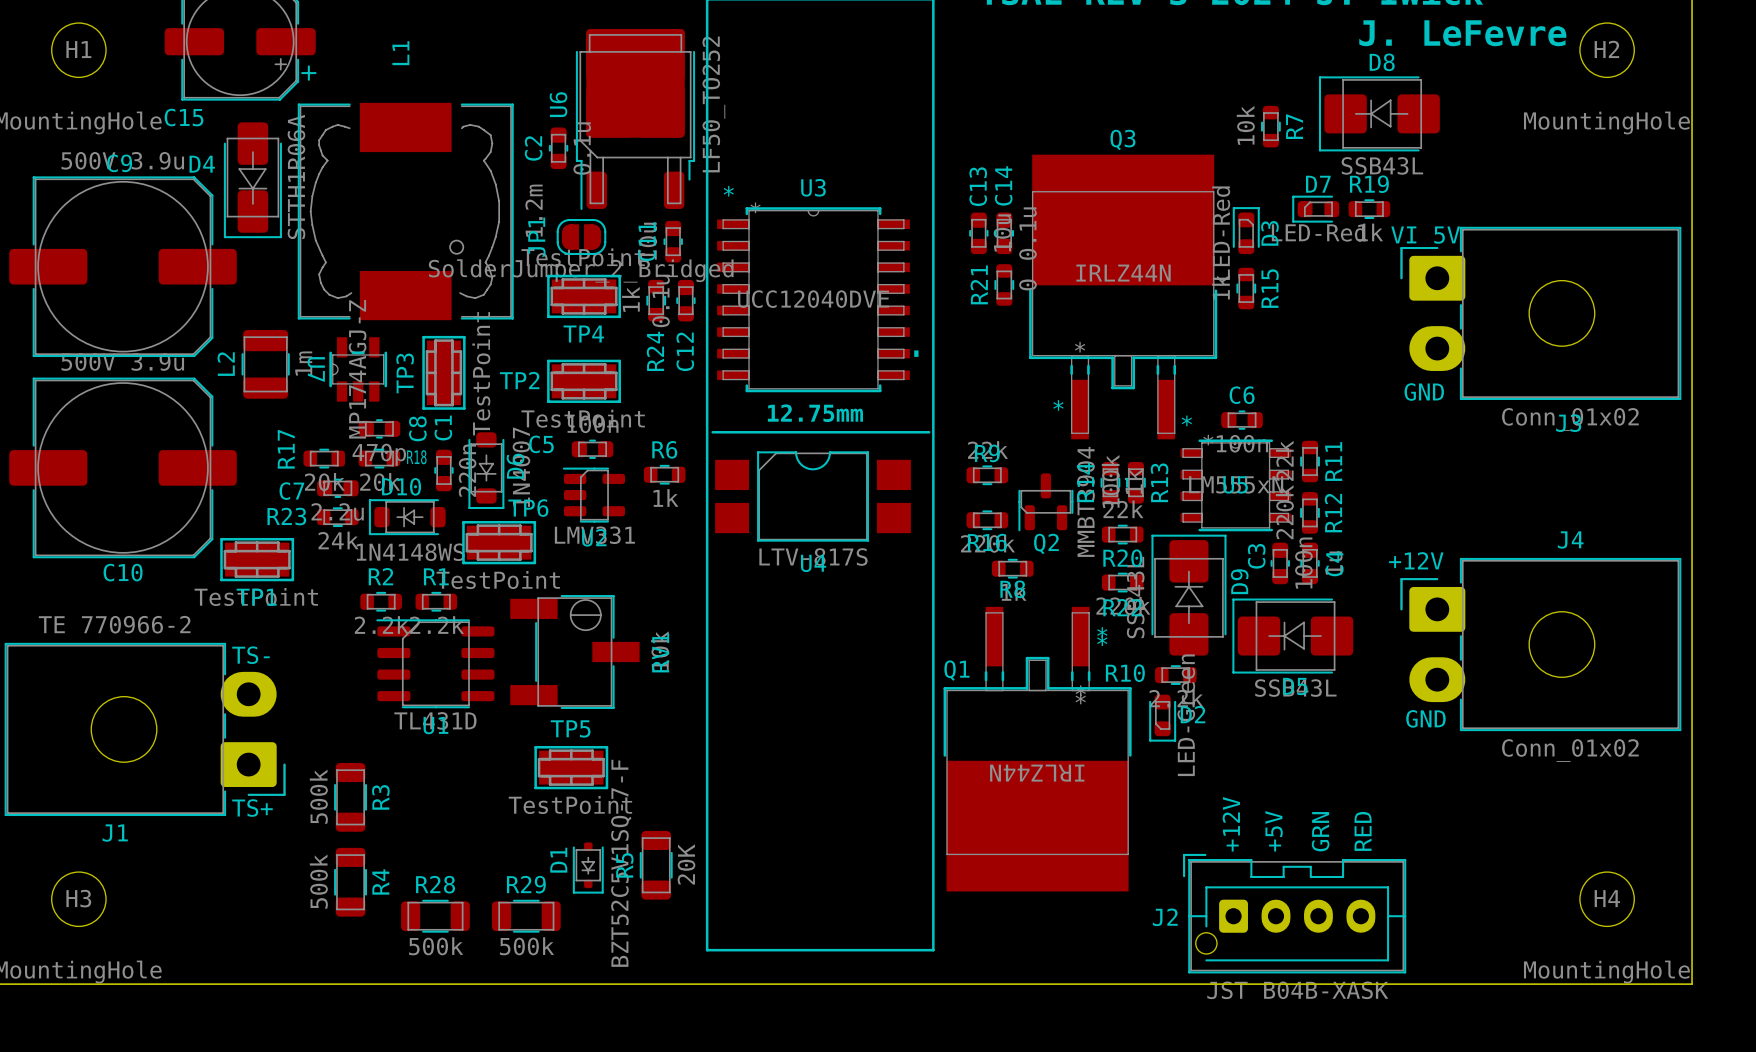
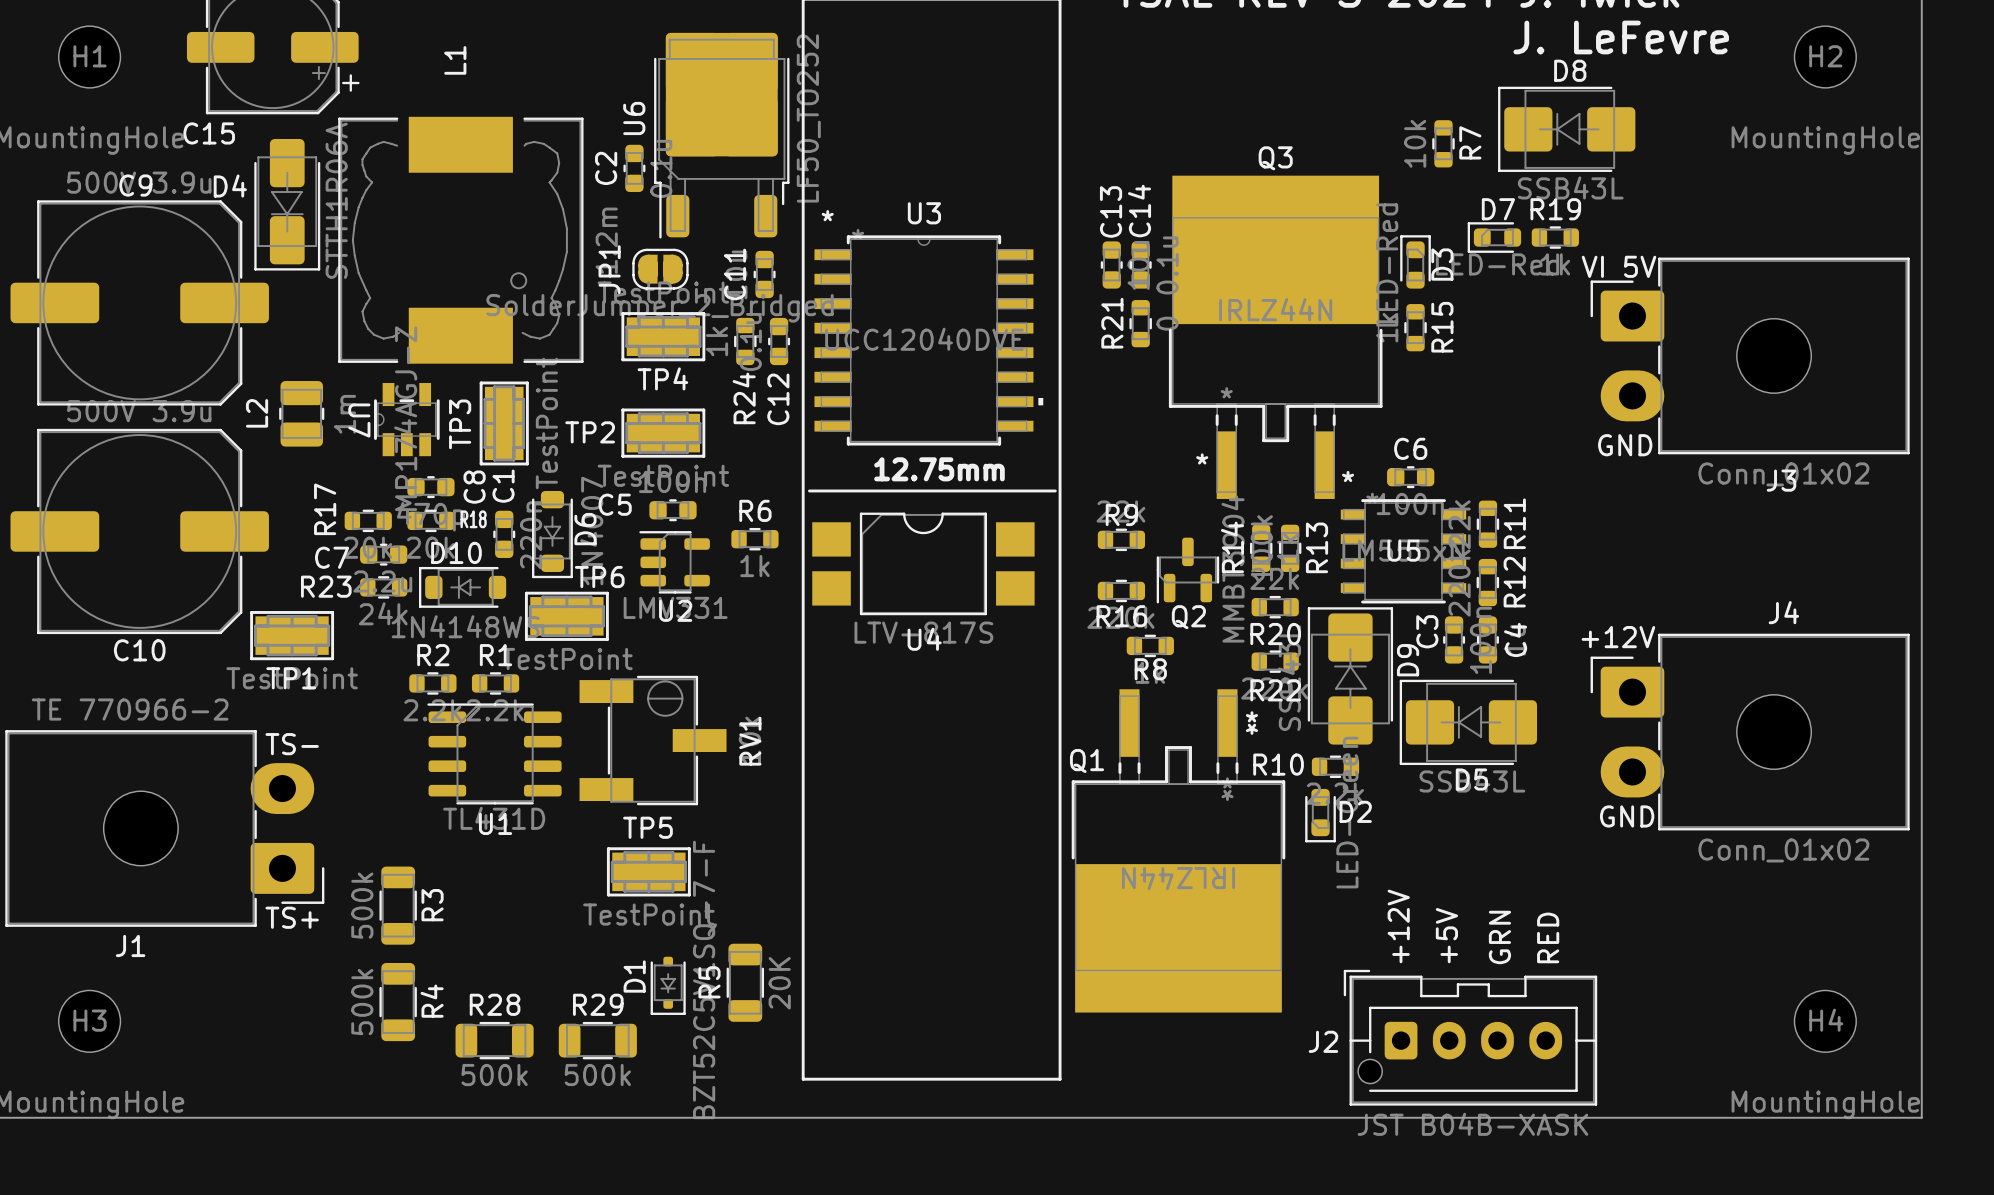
L2 footprint: [241, 329, 290, 399] -> [279, 381, 325, 447]

